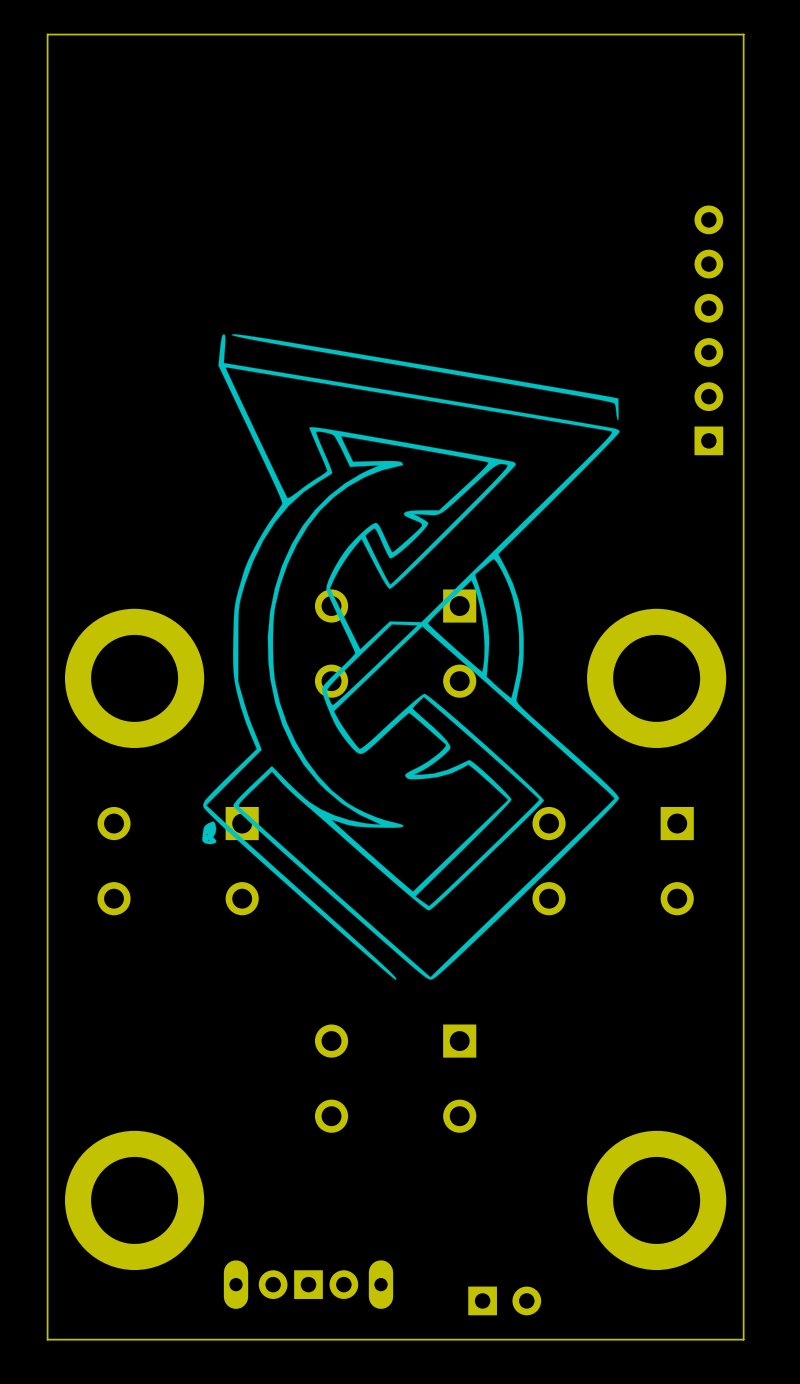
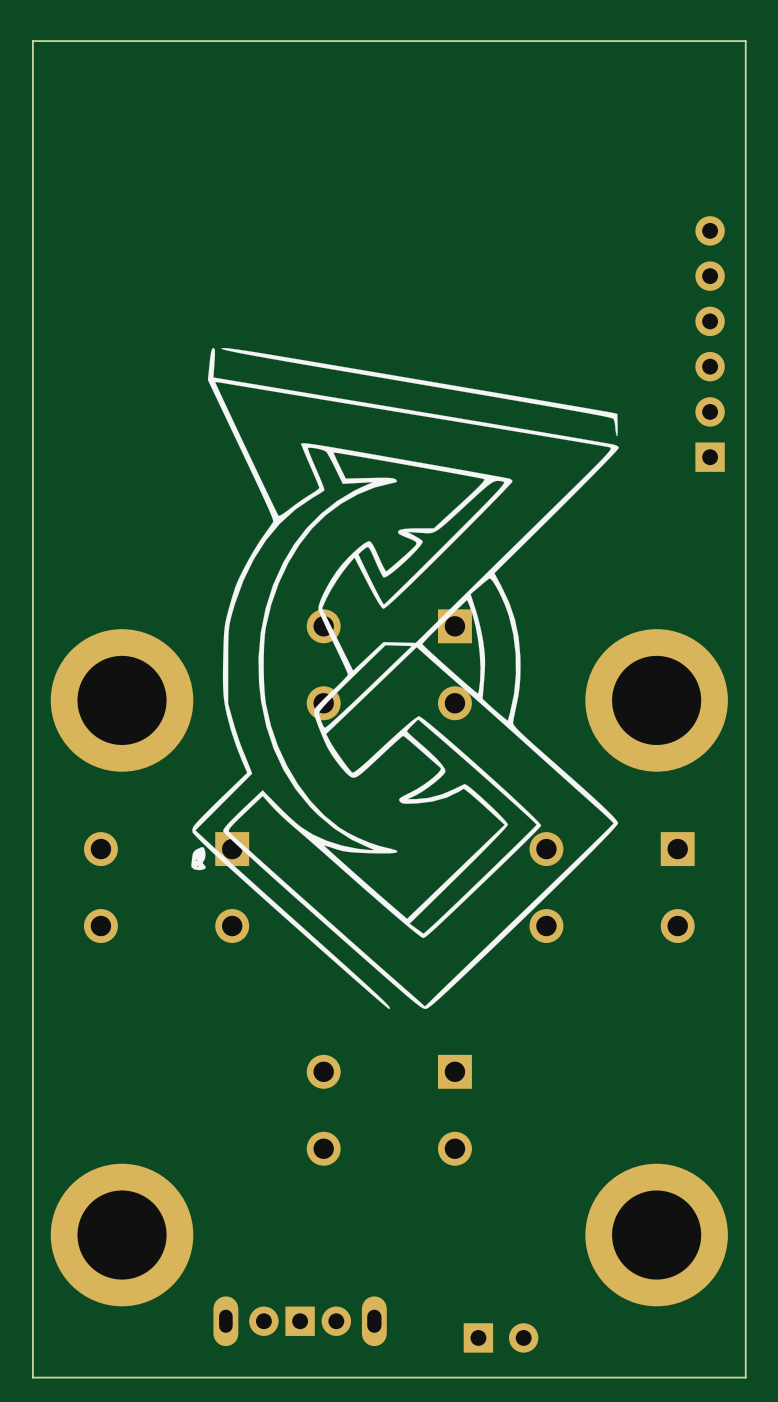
part footprint: [223, 1260, 394, 1309] -> [213, 1296, 387, 1347]

